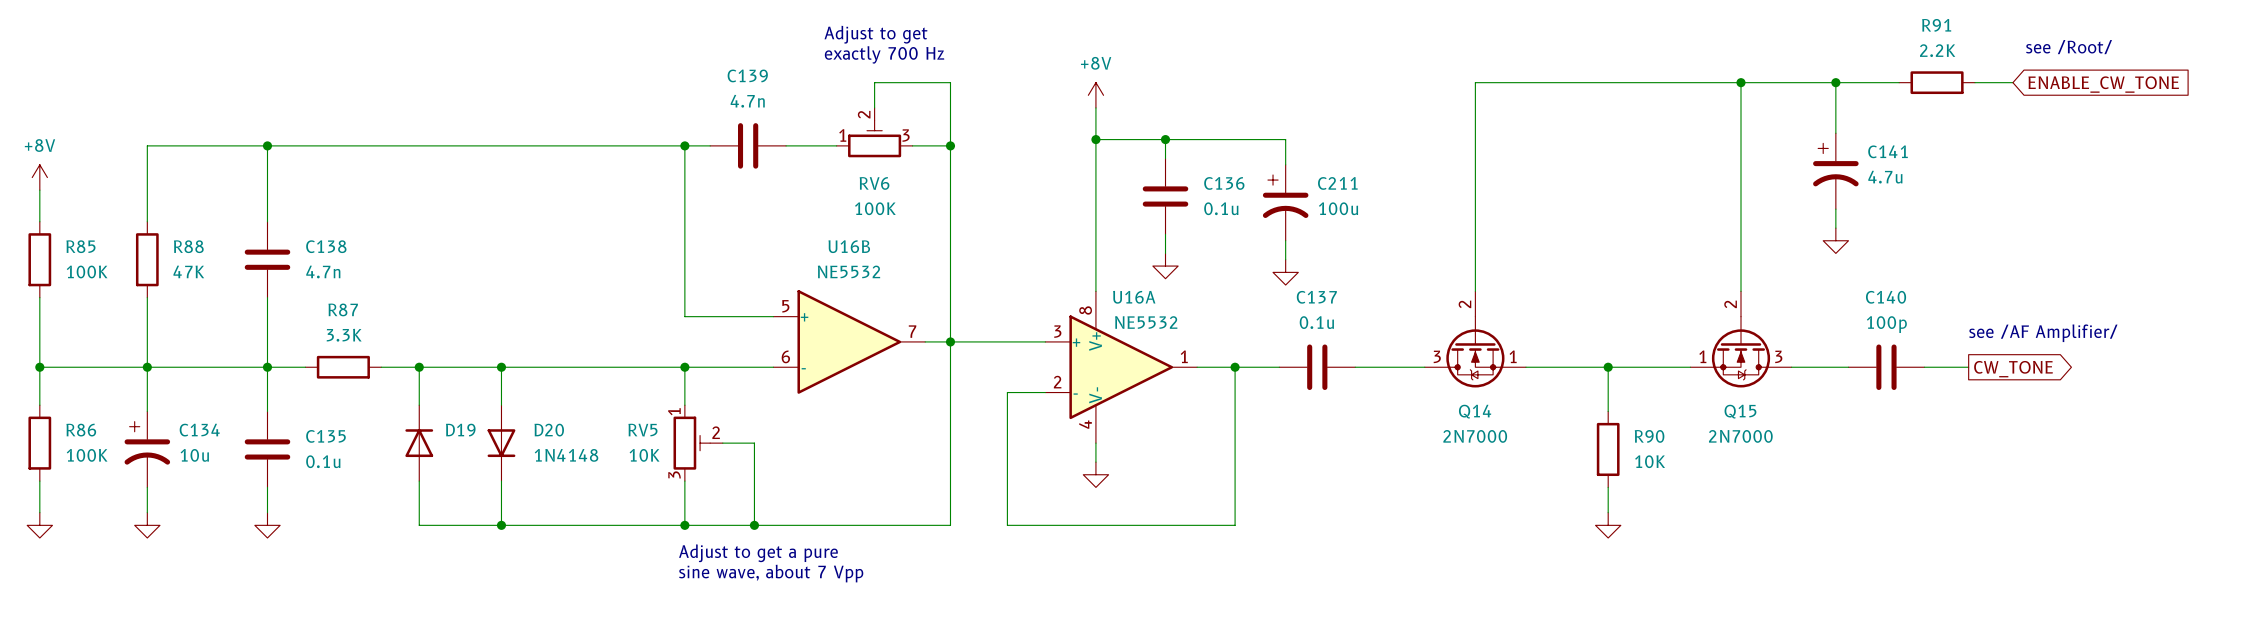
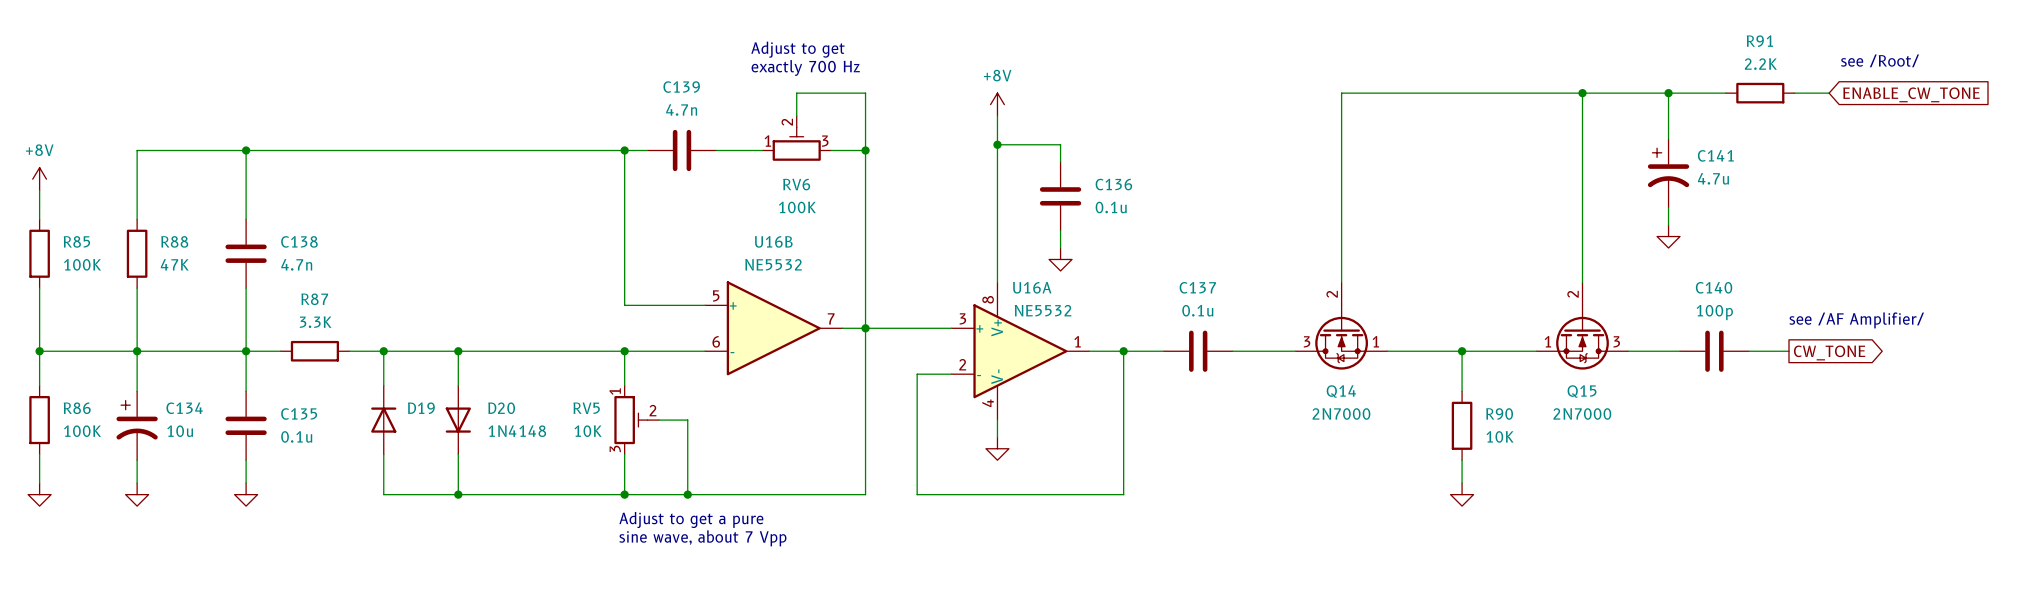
wire: (1165, 139) (1285, 139) (1285, 164) -> none
junction: (1165, 139) -> none
C211: 100u (1285, 202) -> none
wire: (1285, 240) (1285, 259) -> none
power symbol: (1285, 272) -> none

